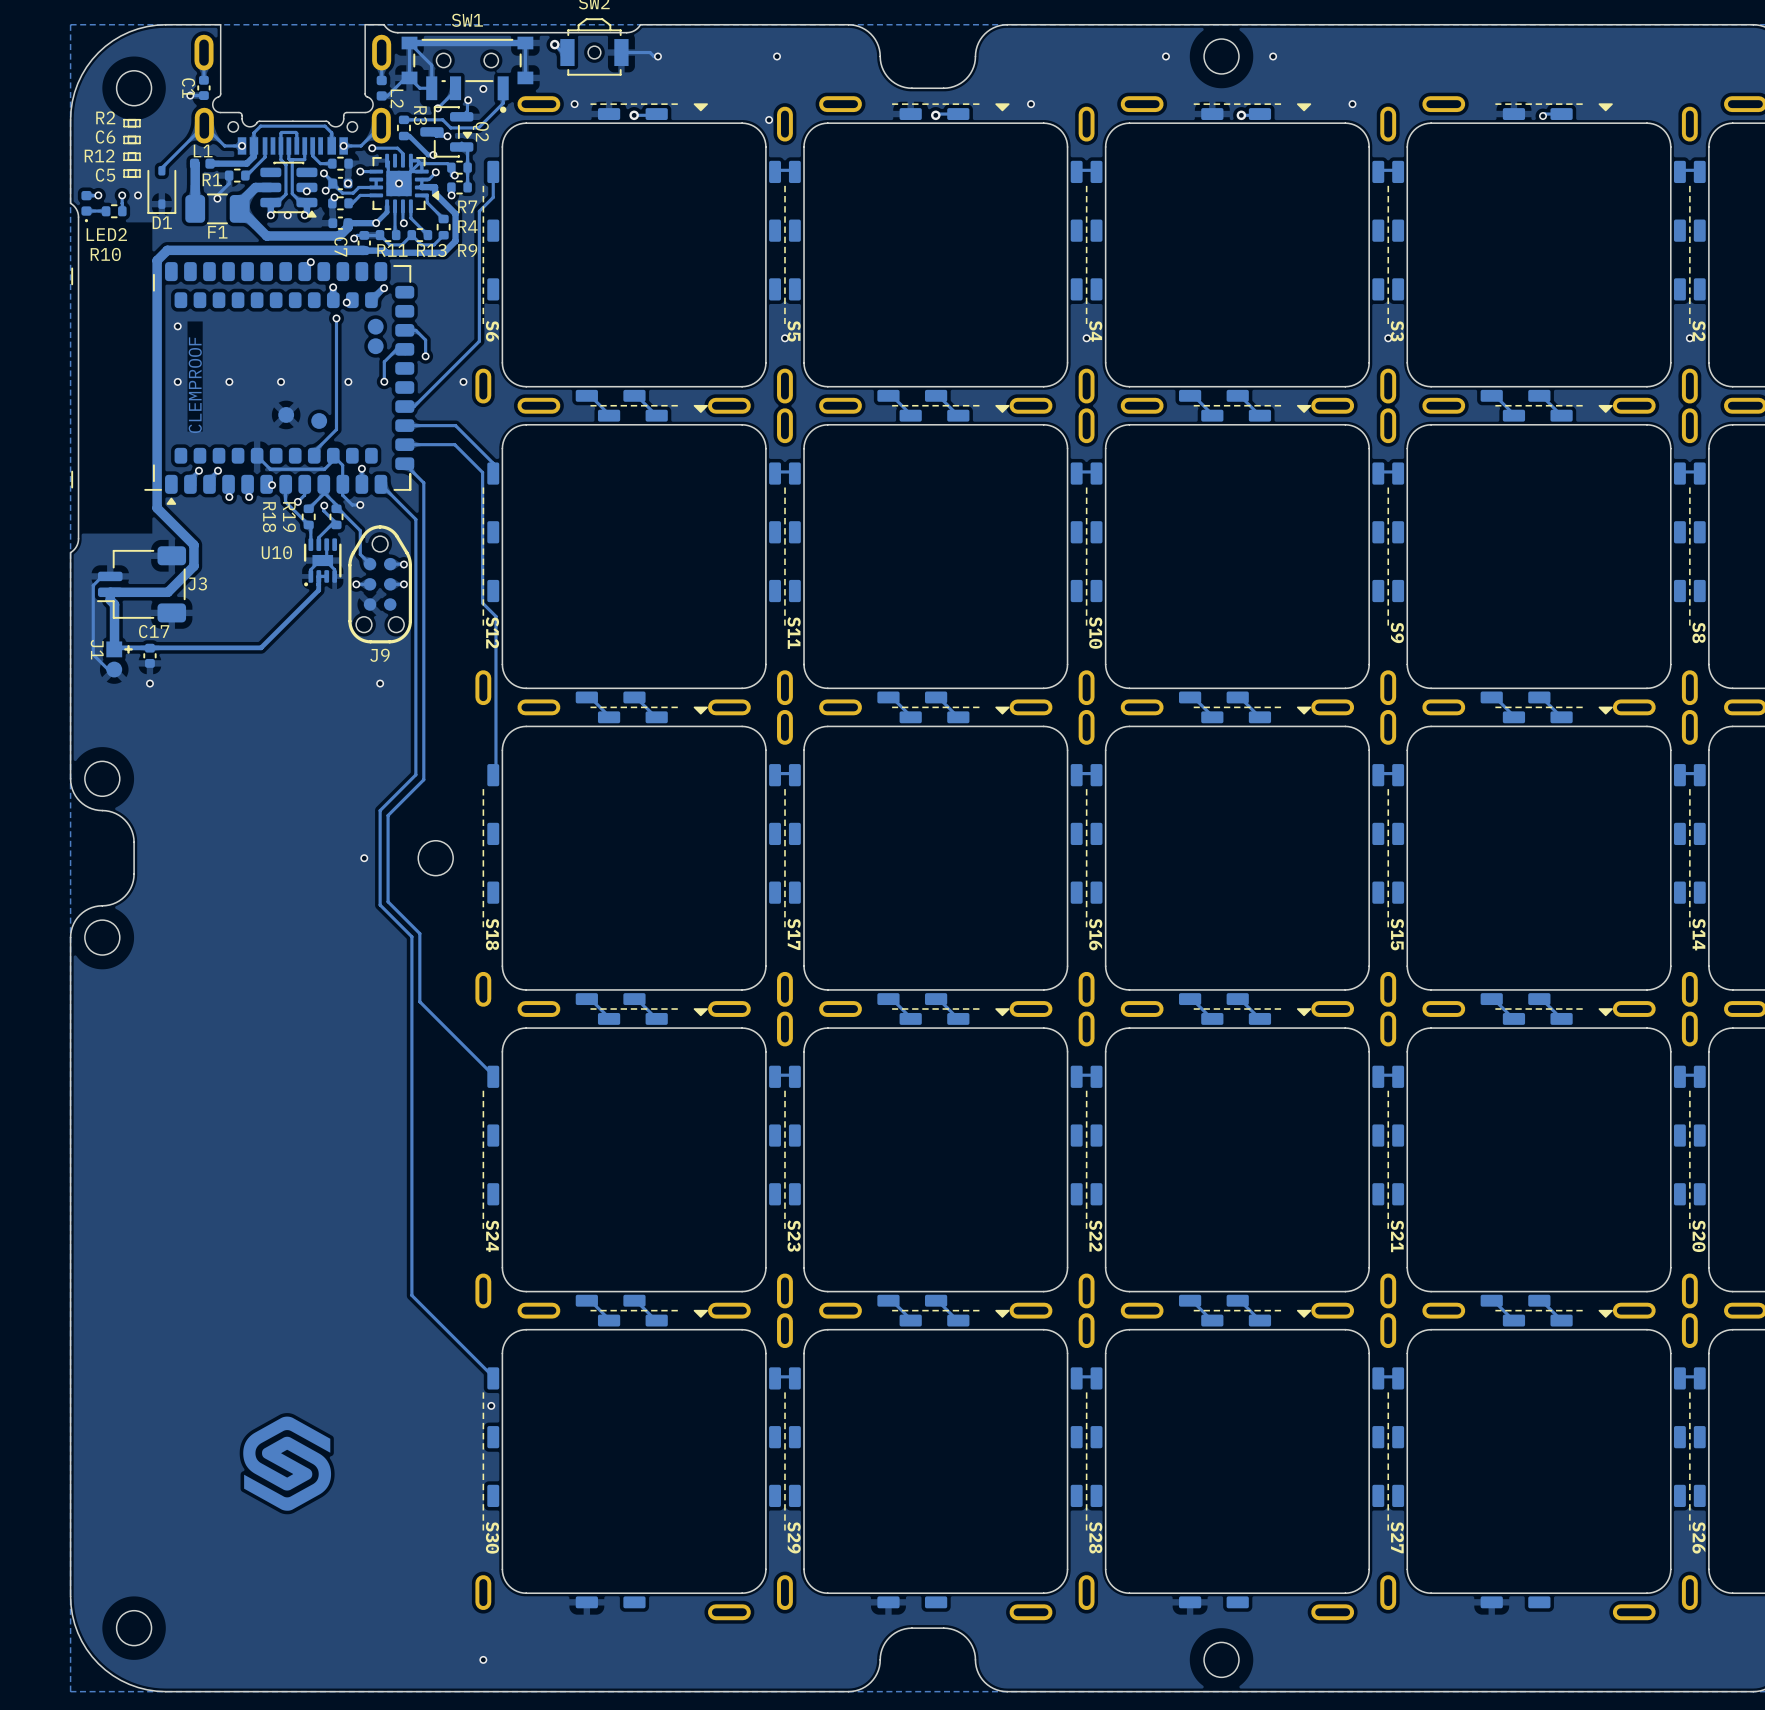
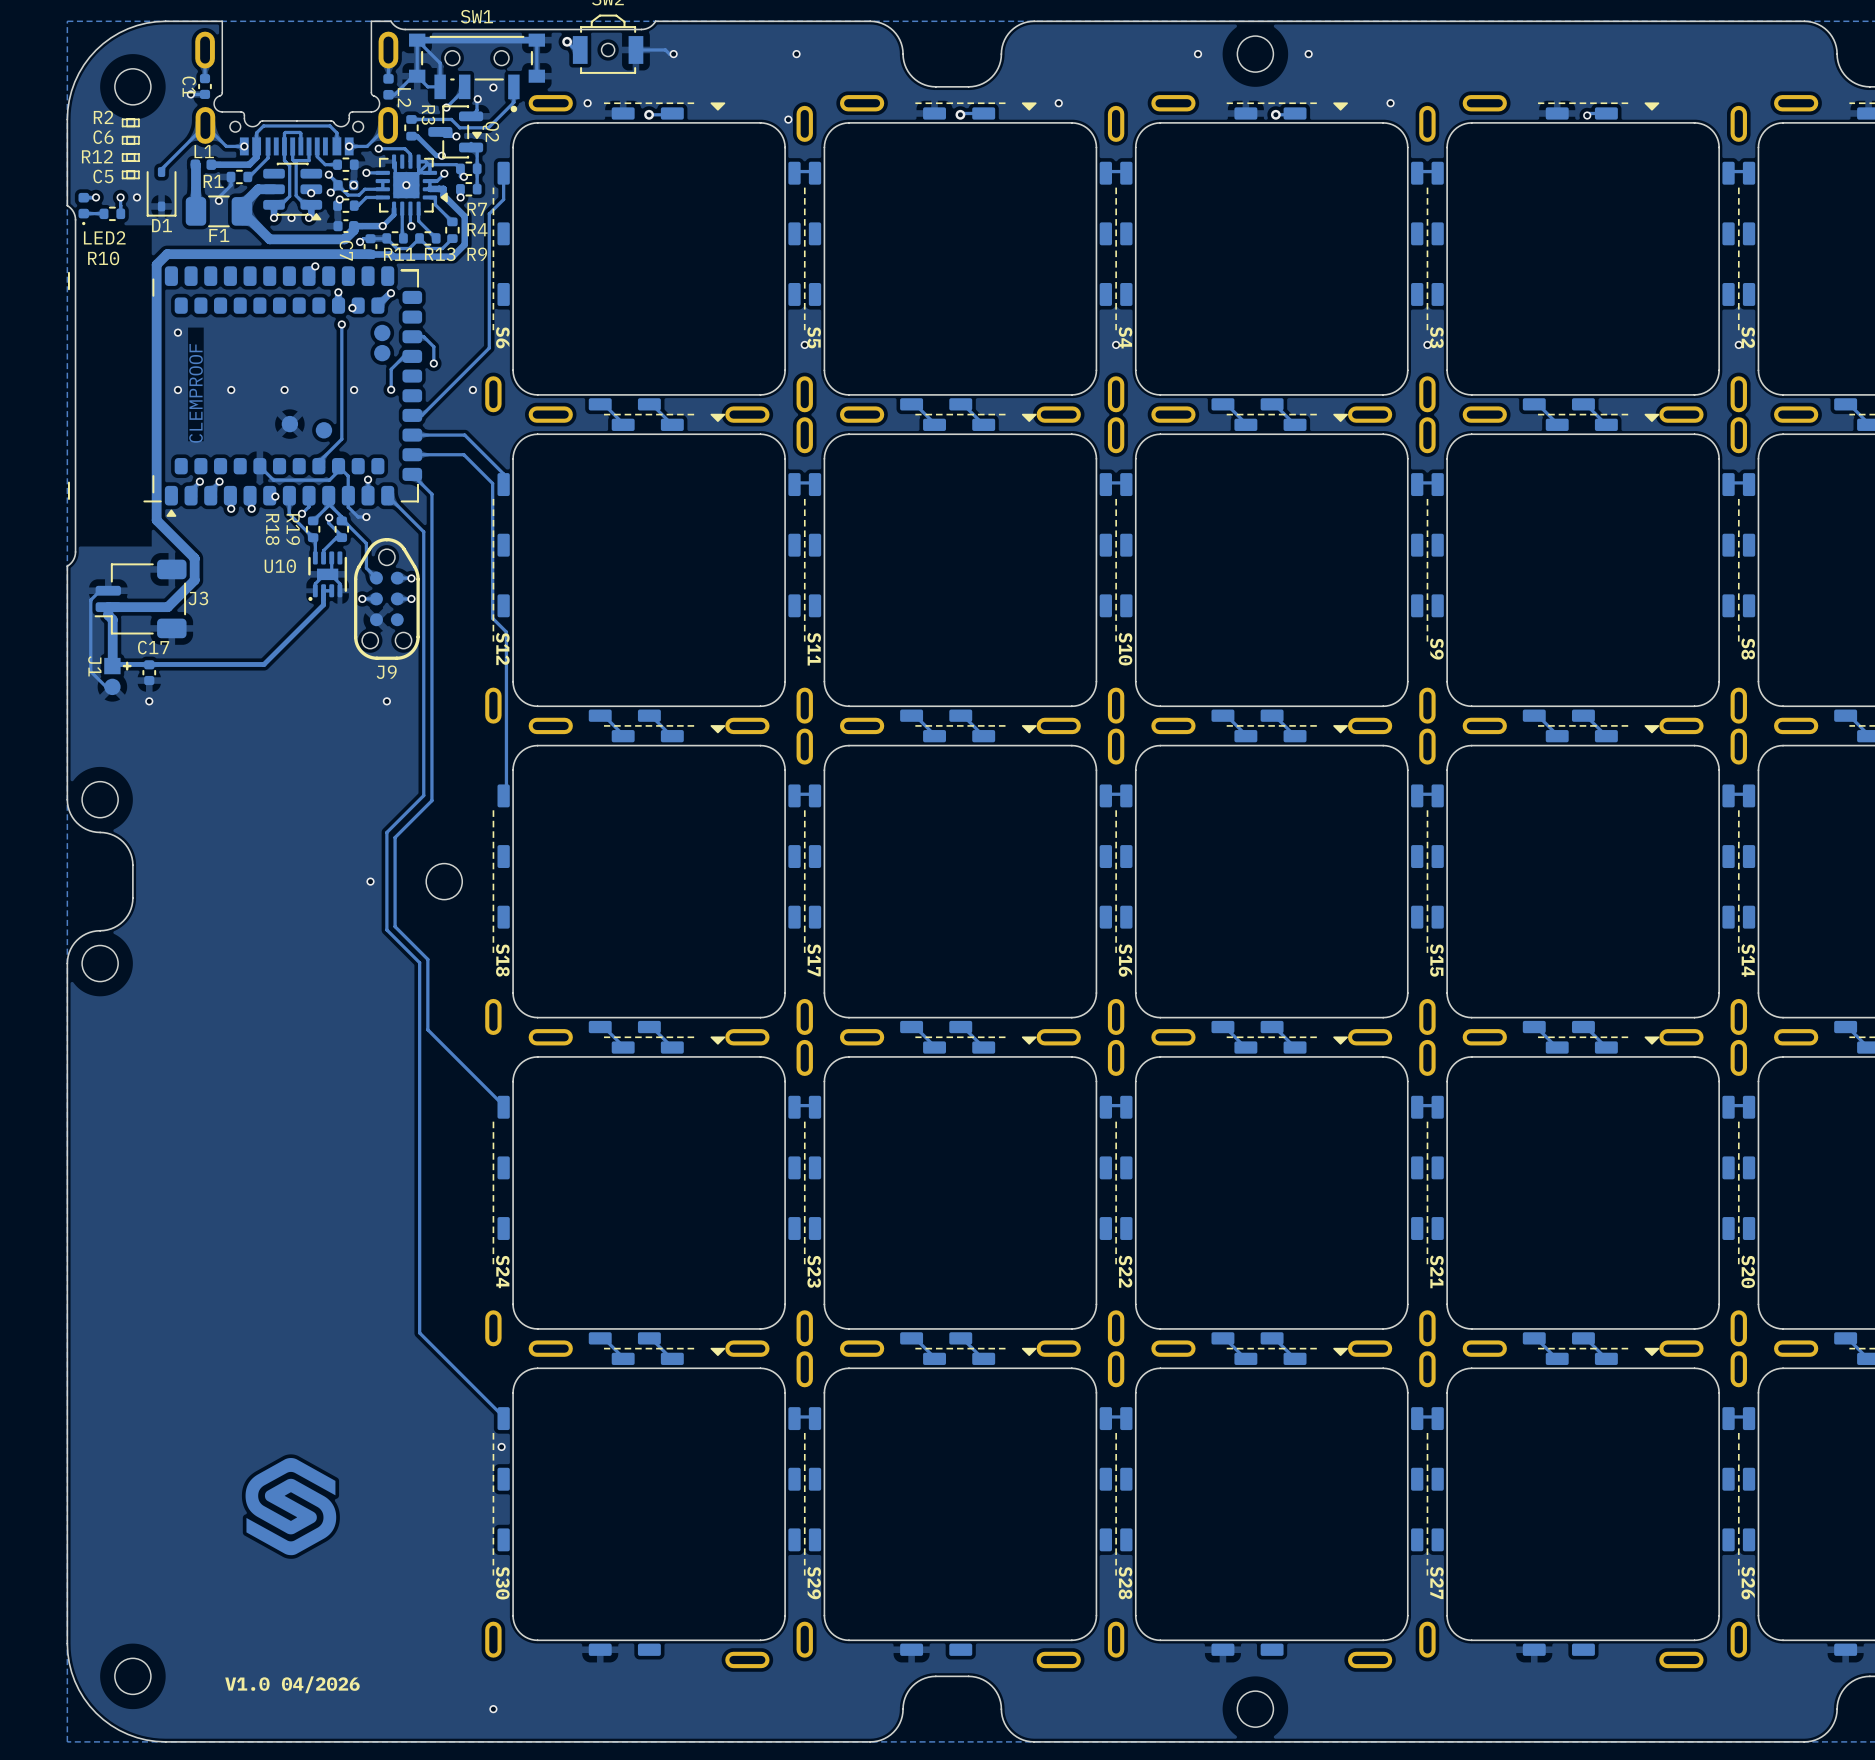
text: none -> V1.0 04/2026 (292, 1684)

